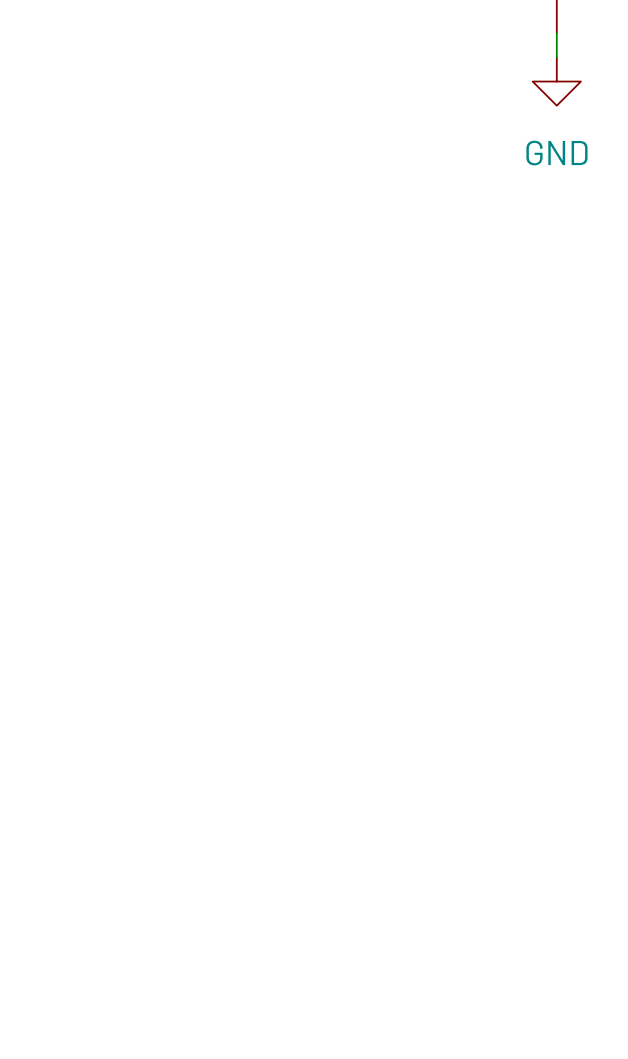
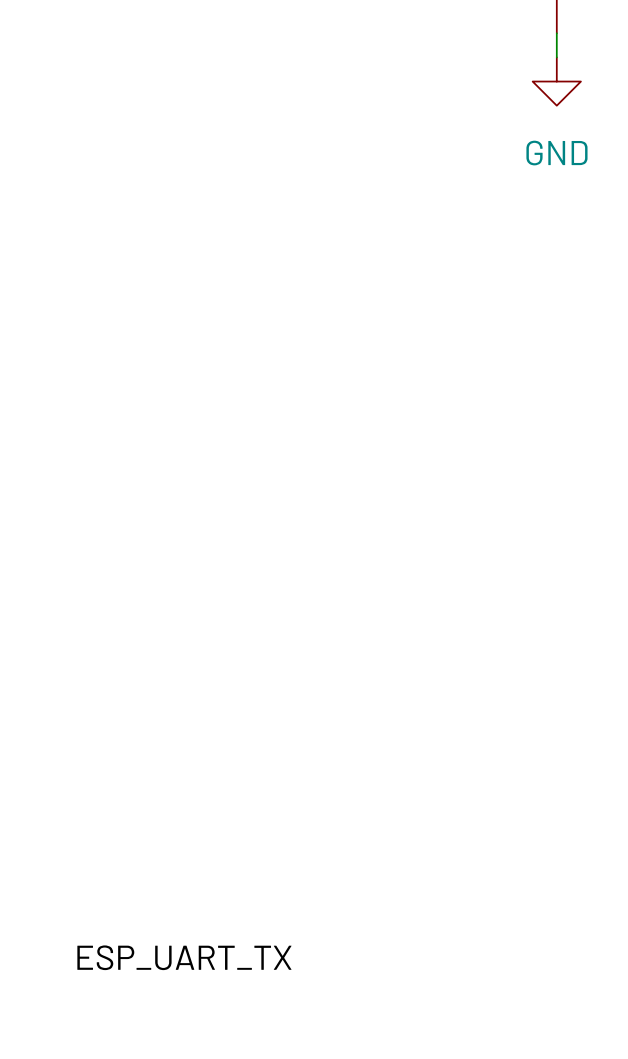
label: none -> ESP_UART_TX (184, 957)

